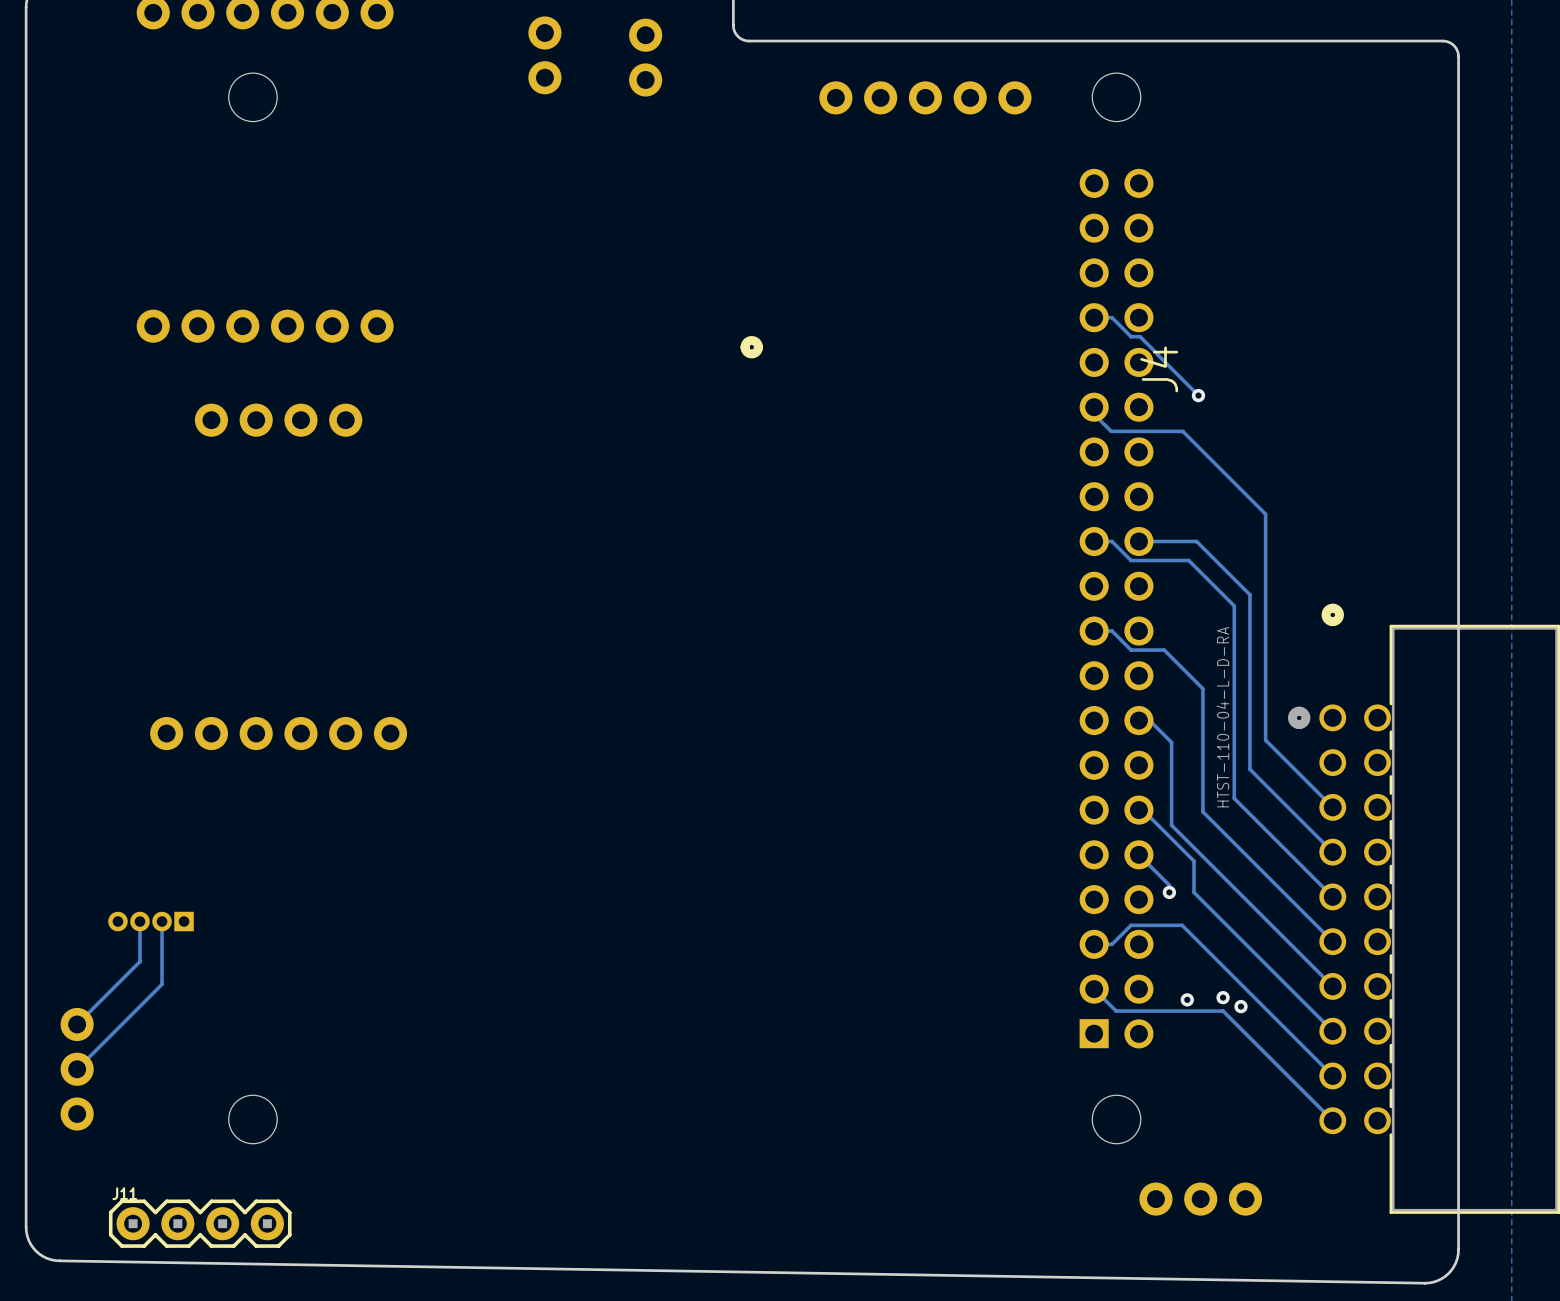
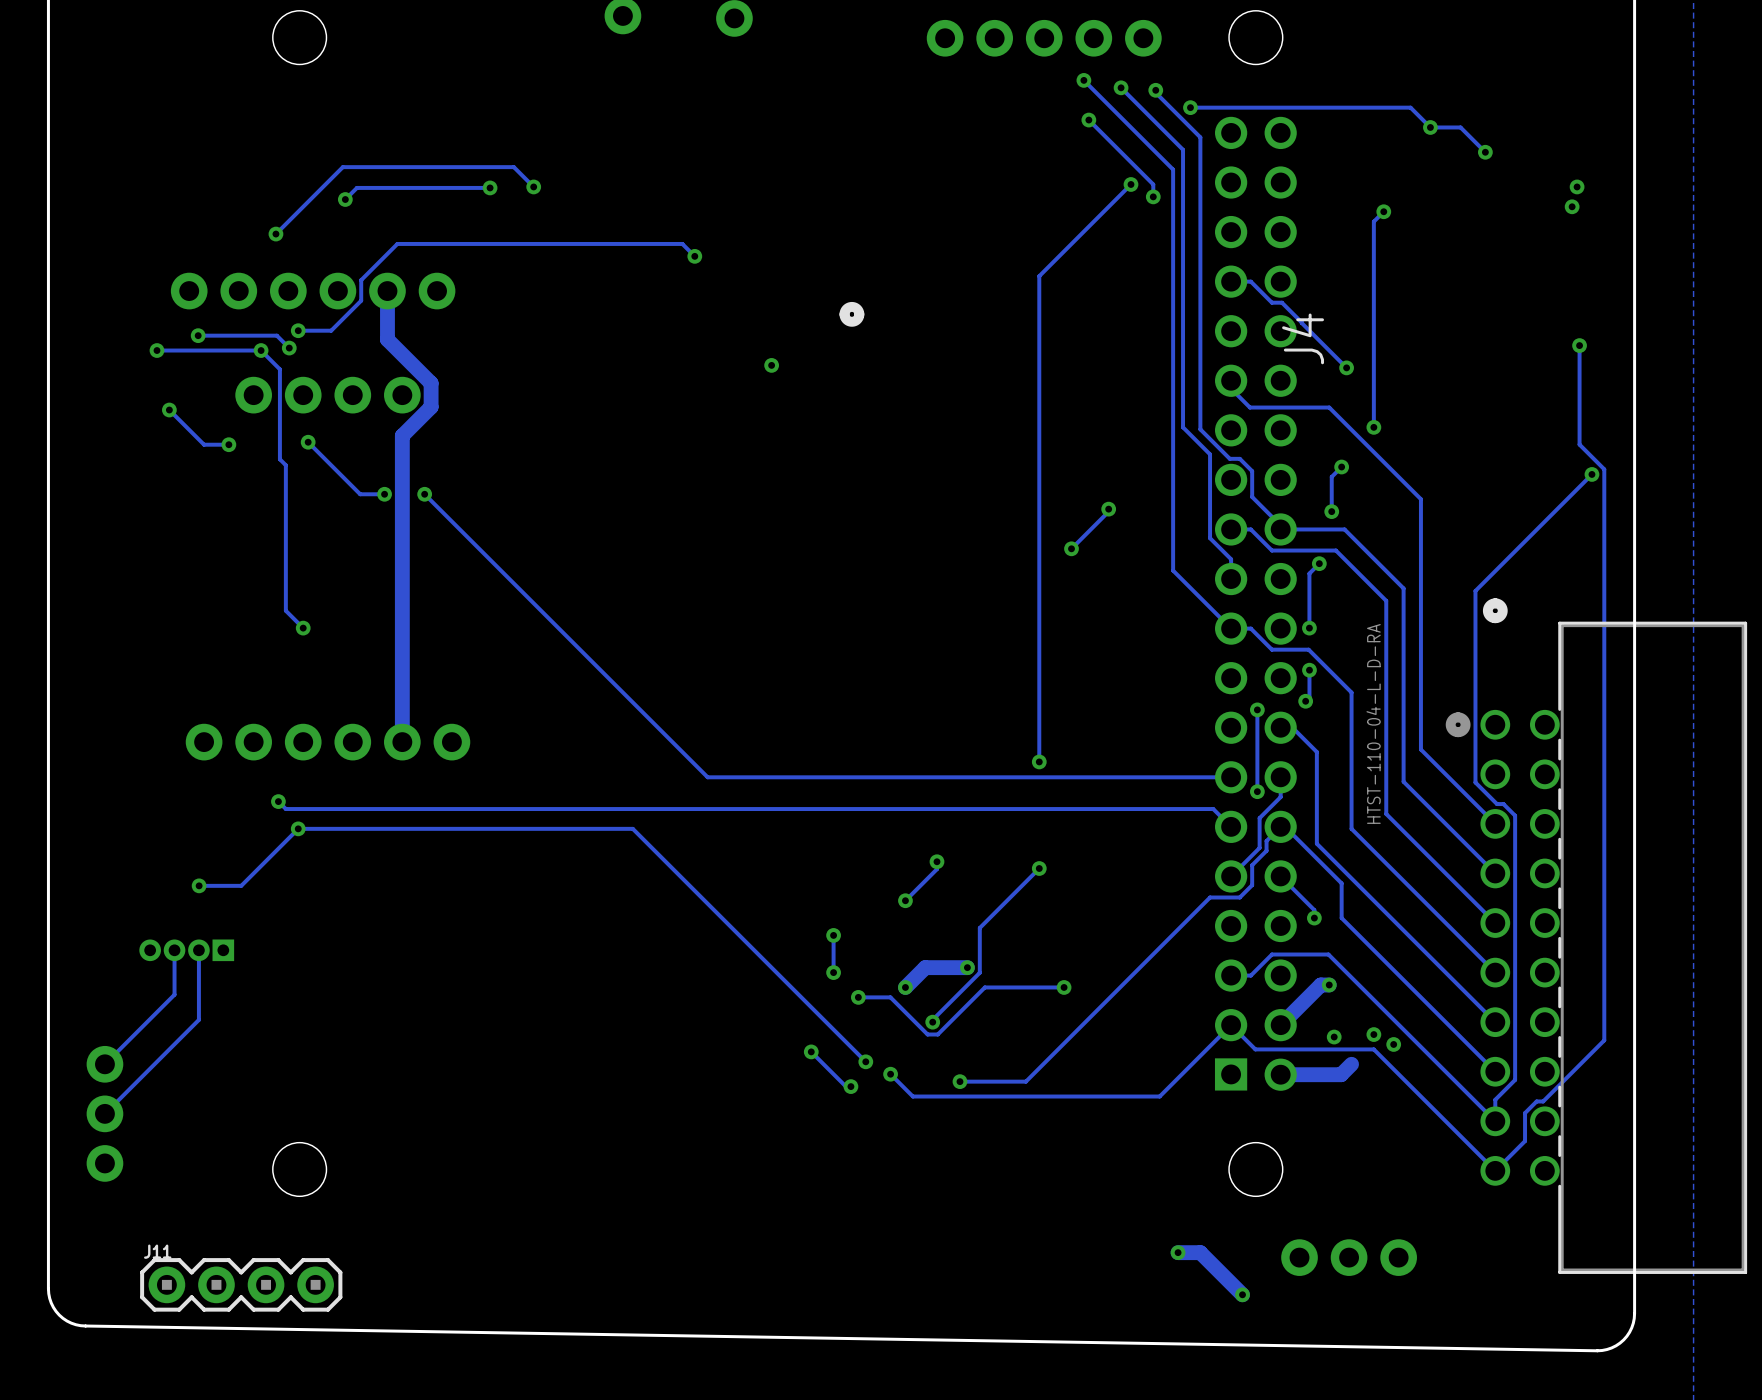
track: none -> (1083, 80) (1173, 169) (1173, 570) (1231, 628)
via: none -> (1083, 80)
track: none -> (1121, 87) (1183, 149) (1183, 427) (1210, 454) (1210, 538) (1231, 559) (1231, 579)
via: none -> (1121, 87)
track: none -> (1155, 90) (1155, 92) (1200, 137) (1200, 429) (1229, 458) (1239, 458) (1252, 471) (1252, 497) (1284, 529)
via: none -> (1155, 90)
track: none -> (1190, 107) (1410, 107) (1430, 127) (1460, 127) (1485, 152)
via: none -> (1190, 107)
track: none -> (1088, 120) (1153, 184) (1153, 196)
via: none -> (1088, 120)
via: none -> (1430, 127)
via: none -> (1485, 152)
track: none -> (1130, 184) (1039, 276) (1039, 761)
via: none -> (1130, 184)
track: none -> (533, 186) (513, 167) (342, 167) (275, 234)
via: none -> (533, 186)
via: none -> (1577, 186)
track: none -> (490, 187) (356, 187) (345, 199)
via: none -> (490, 187)
via: none -> (1153, 196)
via: none -> (345, 199)
via: none -> (1572, 206)
track: none -> (1383, 211) (1373, 221) (1373, 427)
via: none -> (1383, 211)
via: none -> (275, 234)
track: none -> (694, 256) (682, 243) (397, 243) (361, 280) (361, 300) (331, 330) (298, 330)
via: none -> (694, 256)
track: none -> (387, 291) (387, 339) (431, 383) (431, 407) (402, 435) (402, 742)
via: none -> (298, 330)
track: none -> (198, 335) (276, 335) (289, 348)
via: none -> (198, 335)
track: none -> (1579, 345) (1579, 444) (1604, 469) (1604, 1040) (1543, 1101) (1536, 1101) (1525, 1113) (1525, 1141) (1495, 1170)
via: none -> (1579, 345)
via: none -> (289, 348)
track: none -> (156, 350) (261, 350) (279, 369) (279, 459) (285, 465) (285, 610) (303, 628)
via: none -> (156, 350)
via: none -> (261, 350)
via: none -> (771, 365)
track: none -> (169, 410) (204, 444) (228, 444)
via: none -> (169, 410)
via: none -> (1373, 427)
track: none -> (308, 442) (360, 494) (385, 494)
via: none -> (308, 442)
via: none -> (228, 444)
track: none -> (1341, 467) (1331, 476) (1331, 511)
via: none -> (1341, 467)
track: none -> (1591, 474) (1475, 590) (1475, 782) (1497, 804) (1503, 804) (1515, 815) (1515, 1079) (1495, 1099) (1495, 1121)
via: none -> (1591, 474)
via: none -> (384, 494)
track: none -> (424, 494) (707, 777) (1231, 777)
via: none -> (424, 494)
track: none -> (1108, 509) (1106, 514) (1071, 548)
via: none -> (1108, 509)
via: none -> (1331, 511)
via: none -> (1071, 548)
track: none -> (1319, 563) (1309, 573) (1309, 628)
via: none -> (1319, 563)
via: none -> (303, 628)
via: none -> (1309, 628)
track: none -> (1309, 670) (1309, 697) (1305, 701)
via: none -> (1309, 670)
via: none -> (1305, 701)
track: none -> (1257, 709) (1257, 791)
via: none -> (1257, 709)
via: none -> (1039, 761)
track: none -> (1280, 777) (1280, 797) (1259, 818) (1259, 847) (1231, 876)
via: none -> (1257, 791)
track: none -> (278, 801) (285, 809) (1213, 809) (1231, 826)
via: none -> (278, 801)
track: none -> (1280, 826) (1266, 840) (1266, 850) (1252, 865) (1252, 885) (1239, 897) (1210, 897) (1025, 1081) (959, 1081)
via: none -> (298, 828)
track: none -> (936, 861) (936, 869) (905, 900)
via: none -> (936, 861)
track: none -> (1039, 868) (979, 927) (979, 972) (932, 1019) (932, 1022)
via: none -> (1039, 868)
track: none -> (199, 885) (241, 885) (298, 828) (632, 828) (865, 1061)
via: none -> (199, 885)
via: none -> (905, 900)
track: none -> (833, 935) (833, 972)
via: none -> (833, 935)
track: none -> (967, 967) (925, 967) (905, 987)
via: none -> (967, 967)
via: none -> (833, 972)
track: none -> (1329, 984) (1320, 984) (1280, 1025)
via: none -> (1329, 984)
via: none -> (905, 987)
track: none -> (1064, 987) (984, 987) (937, 1034) (927, 1034) (890, 997) (858, 997)
via: none -> (1064, 987)
via: none -> (858, 997)
via: none -> (932, 1022)
track: none -> (1231, 1025) (1159, 1096) (912, 1096) (890, 1074)
track: none -> (811, 1051) (845, 1086) (850, 1086)
via: none -> (811, 1051)
via: none -> (865, 1061)
track: none -> (1351, 1064) (1341, 1074) (1280, 1074)
via: none -> (890, 1074)
via: none -> (959, 1081)
via: none -> (850, 1086)
track: none -> (1178, 1252) (1200, 1252) (1242, 1294)
via: none -> (1178, 1252)
via: none -> (1242, 1294)

